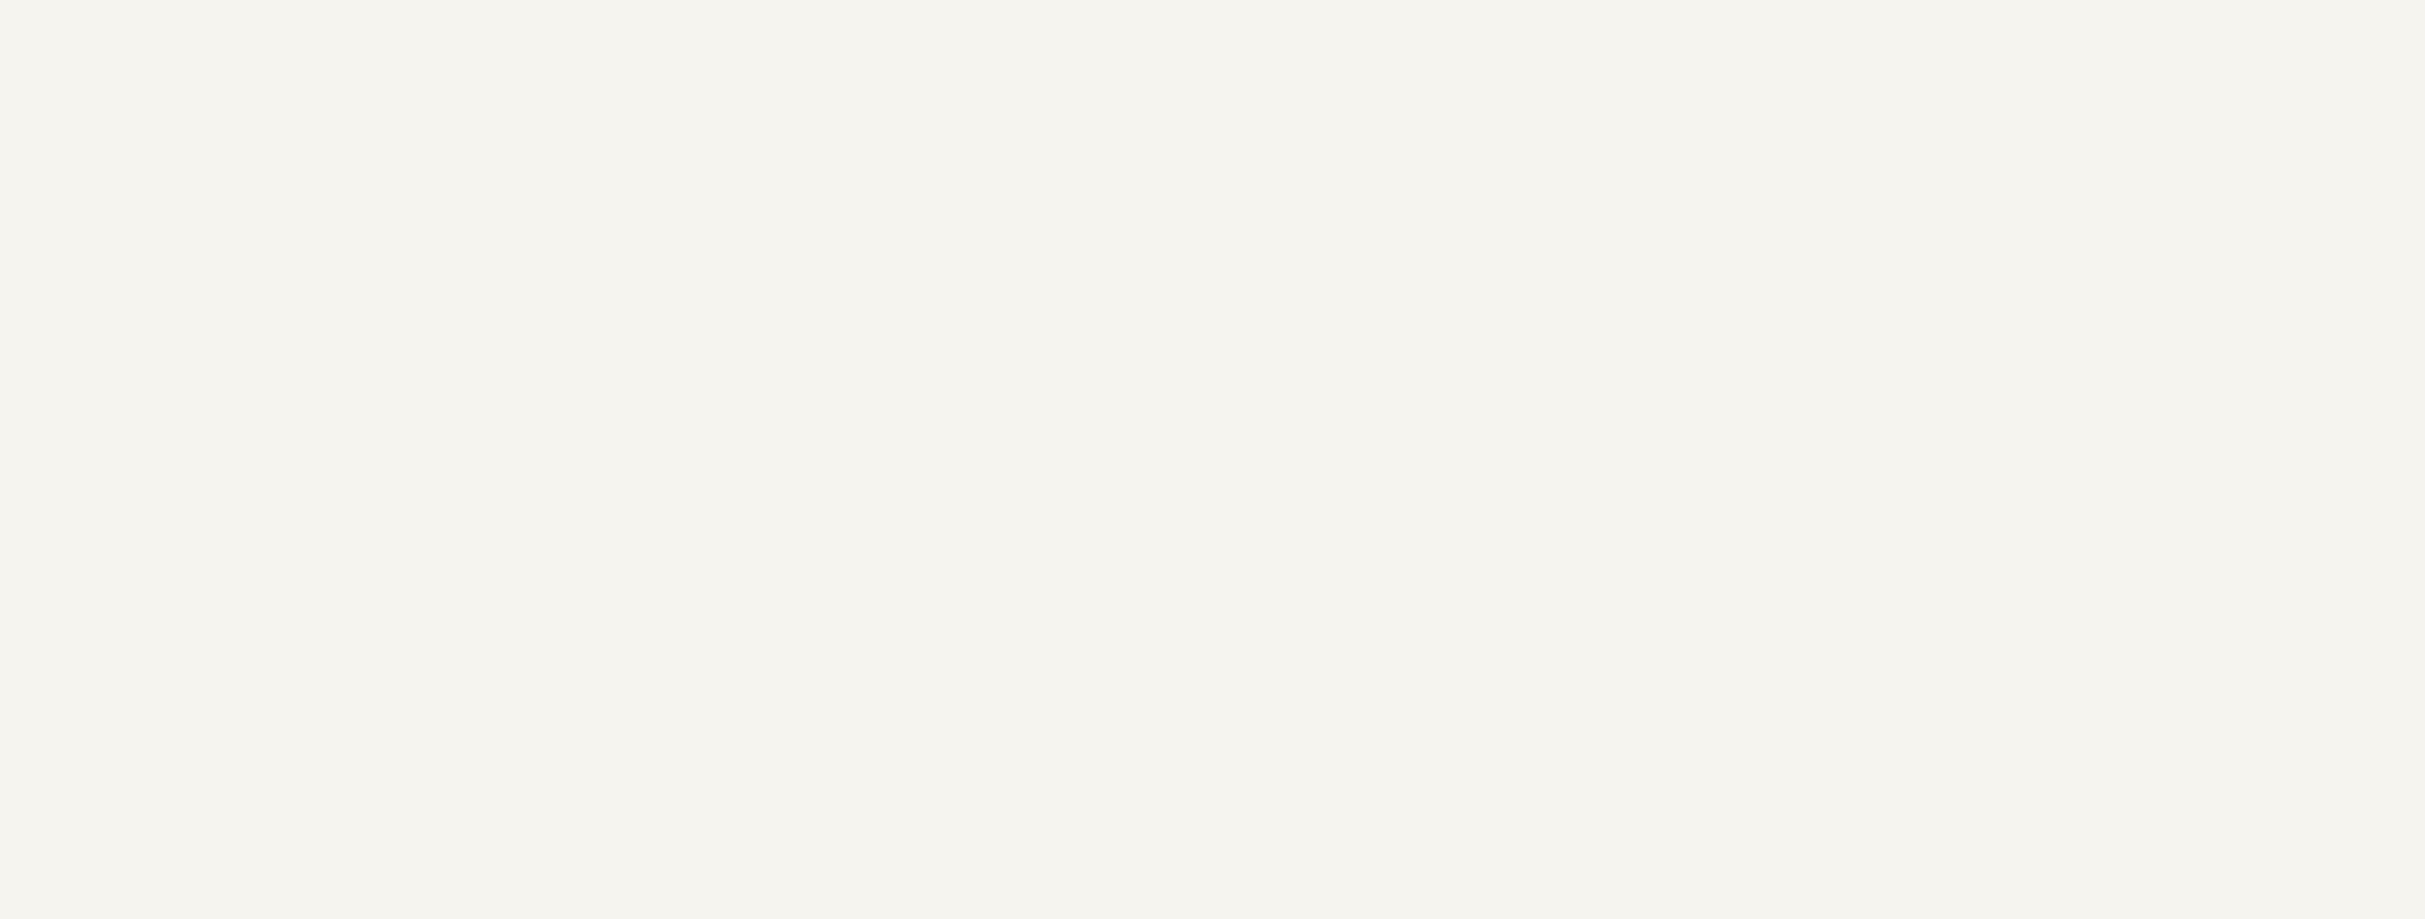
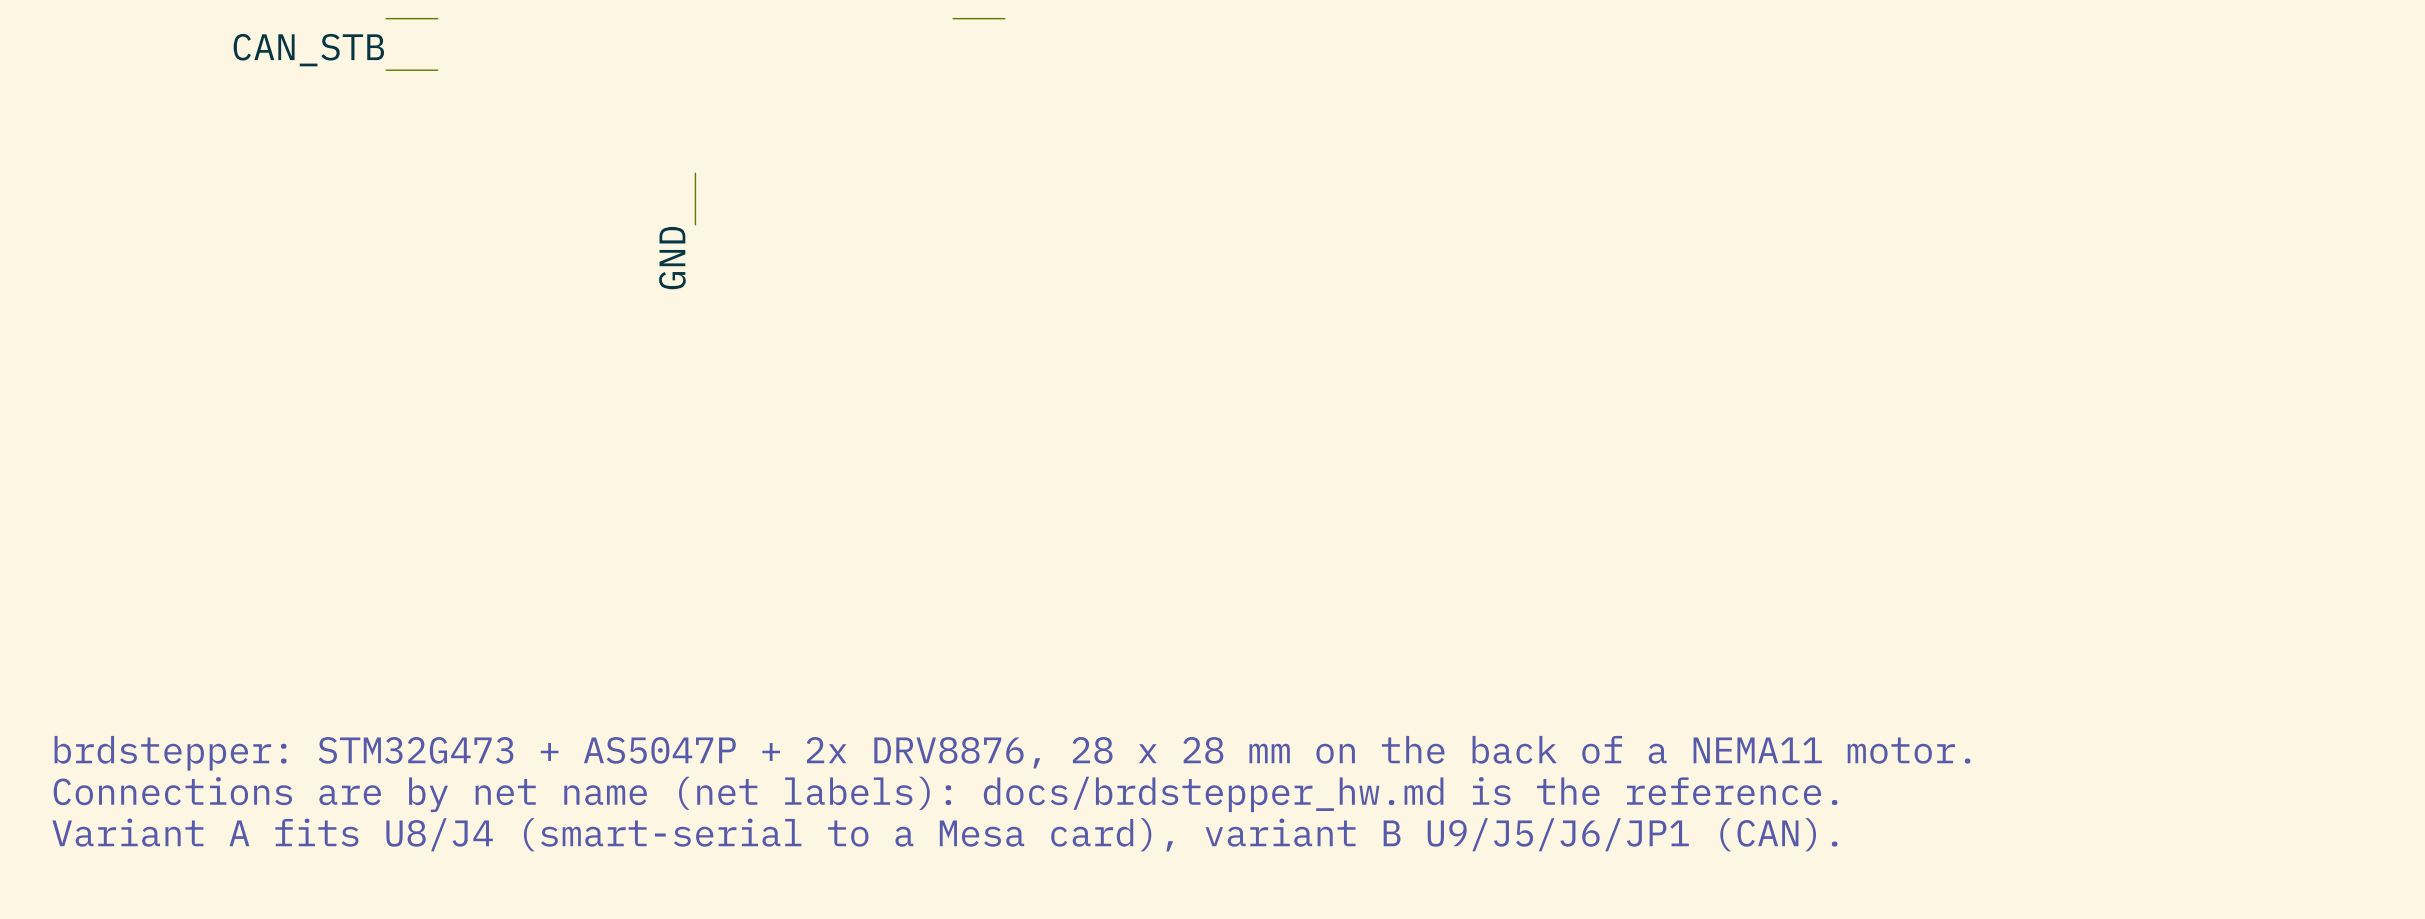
wire: none -> (386, 18) (437, 18)
wire: none -> (953, 18) (1004, 18)
label: none -> CAN_STB (308, 50)
wire: none -> (386, 70) (437, 70)
wire: none -> (695, 173) (695, 224)
label: none -> GND (672, 258)
text: none -> brdstepper: STM32G473 + AS5047P + 2x DRV8876, 28 x 28 mm on the back of a NEMA11 motor. (1012, 753)
text: none -> Connections are by net name (net labels): docs/brdstepper_hw.md is the reference. (945, 794)
text: none -> Variant A fits U8/J4 (smart-serial to a Mesa card), variant B U9/J5/J6/JP1 (CAN). (944, 834)

